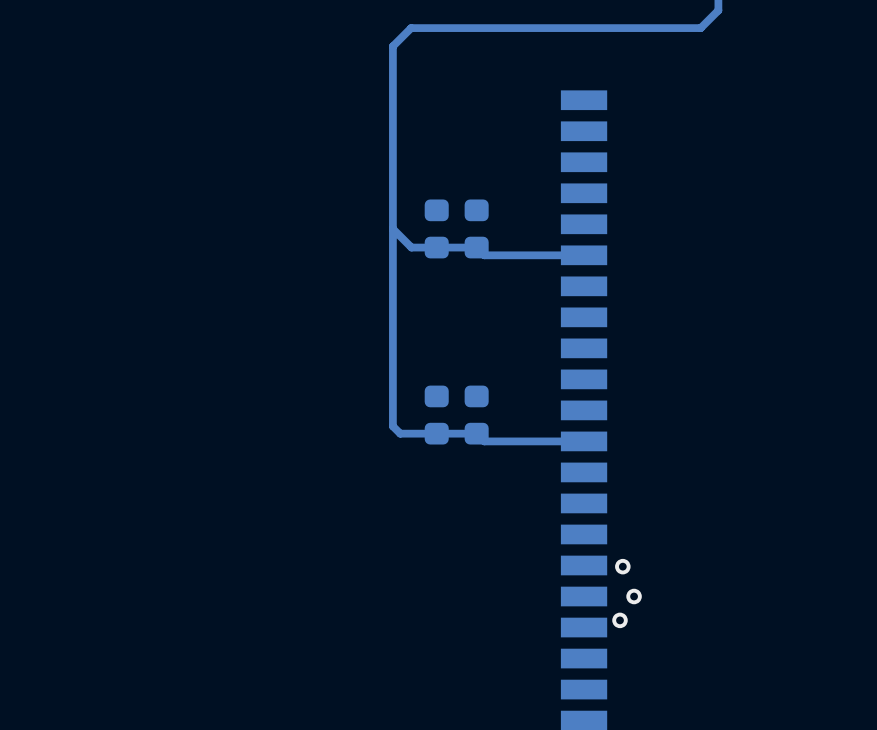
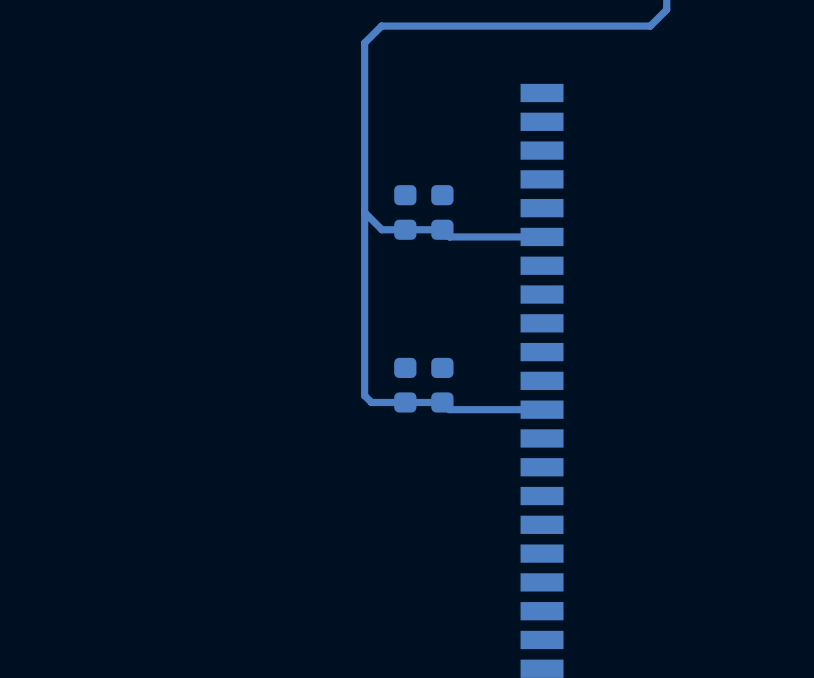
via: (622, 566) -> none
via: (634, 596) -> none
via: (620, 620) -> none

